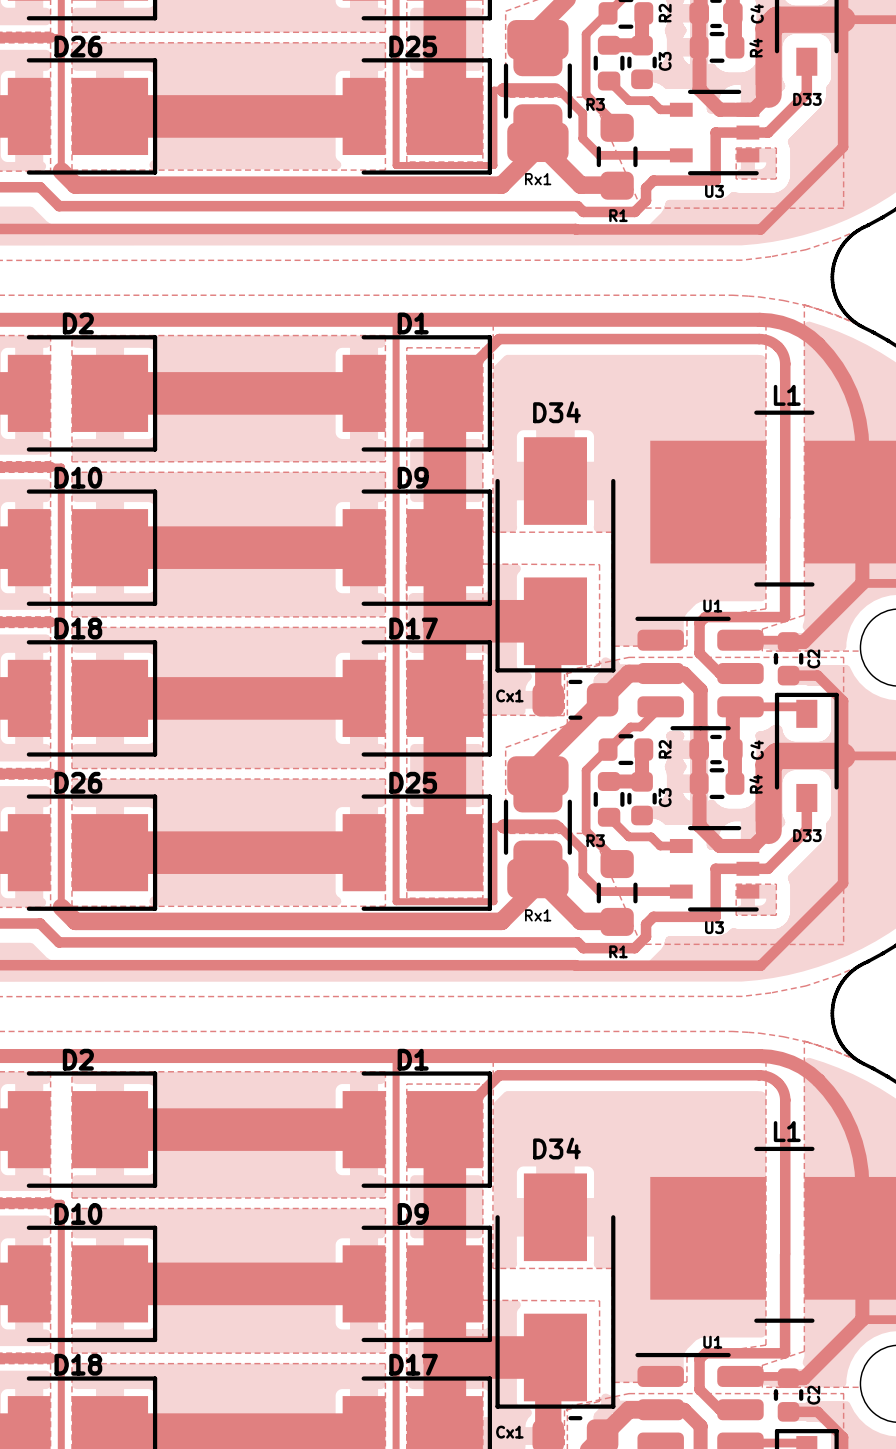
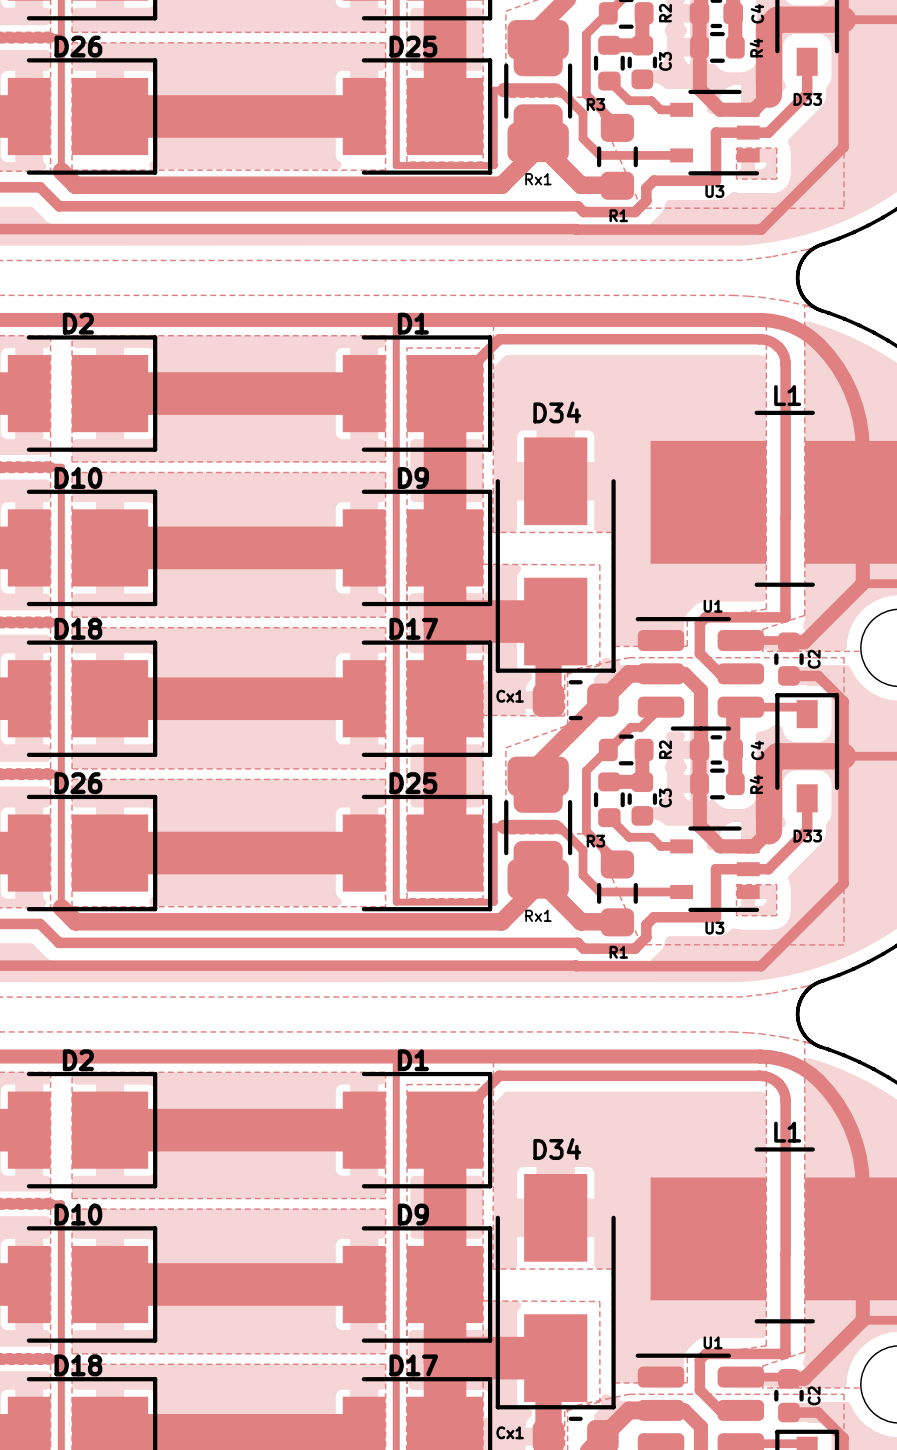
board edge: (864, 227) (852, 234) (841, 246) (834, 260) (832, 276) (834, 293) (841, 307) (852, 319) (863, 327) -> (822, 244) (809, 251) (800, 264) (797, 279) (801, 293) (815, 308) (863, 327)
board edge: none -> (864, 227) (822, 244)
board edge: (864, 963) (852, 970) (841, 982) (834, 997) (832, 1013) (834, 1029) (841, 1043) (852, 1056) (863, 1063) -> (822, 980) (809, 988) (800, 1000) (797, 1015) (801, 1030) (815, 1044) (863, 1064)
board edge: none -> (864, 963) (822, 980)

